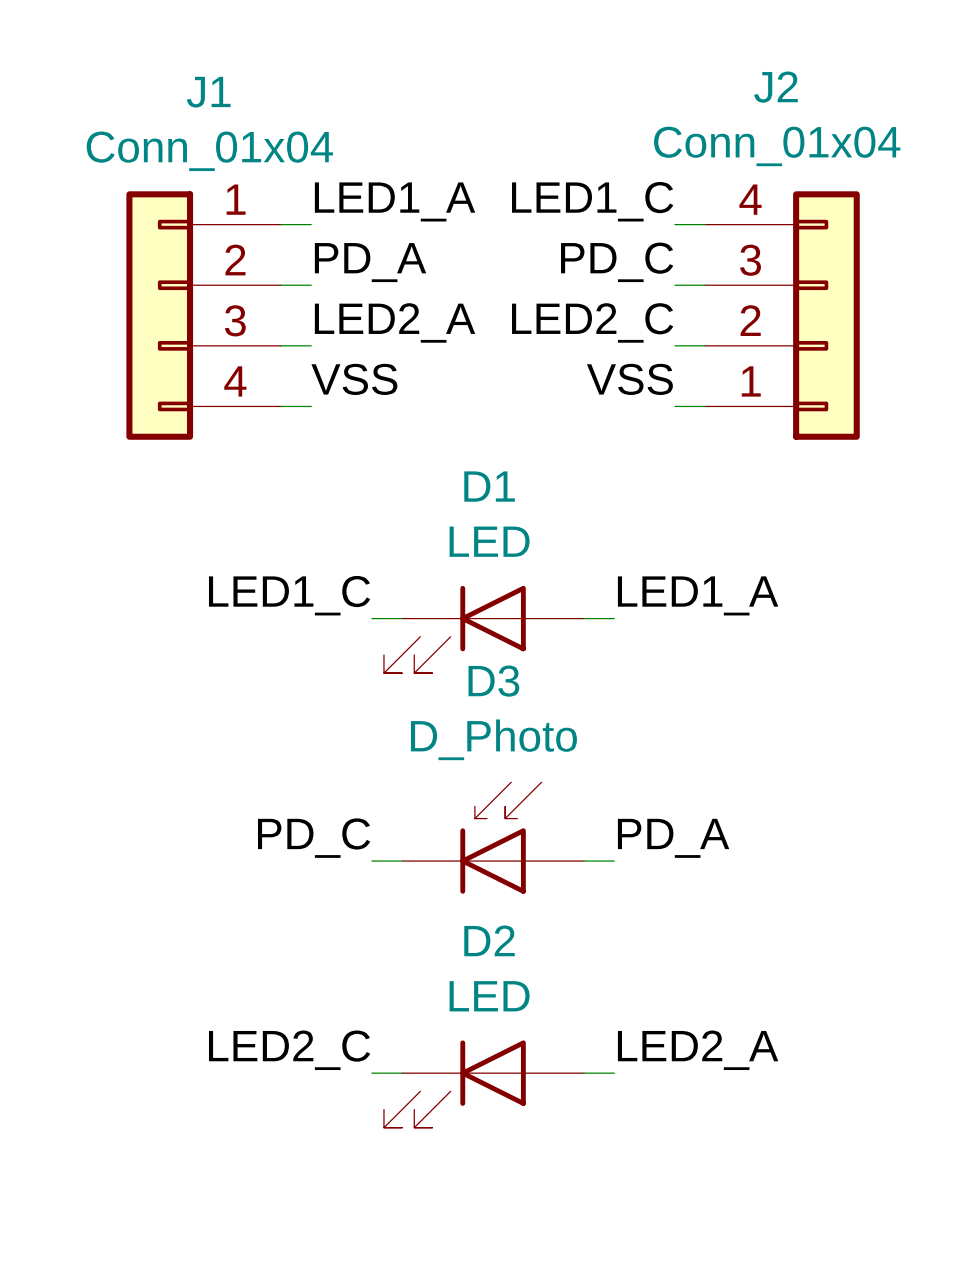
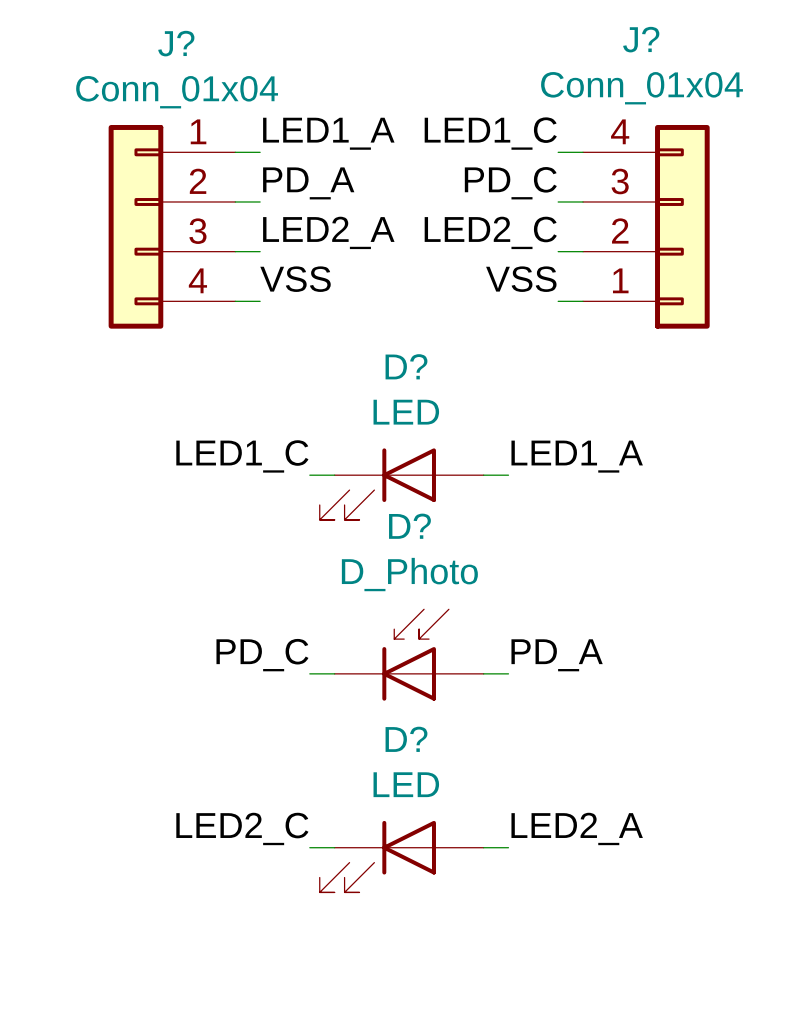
J2 name: J2 (775, 87) -> J? (641, 39)
J1 name: J1 (208, 92) -> J? (176, 43)
D1 name: D1 (489, 486) -> D? (406, 366)
D3 name: D3 (493, 681) -> D? (409, 526)
D2 name: D2 (489, 940) -> D? (406, 739)

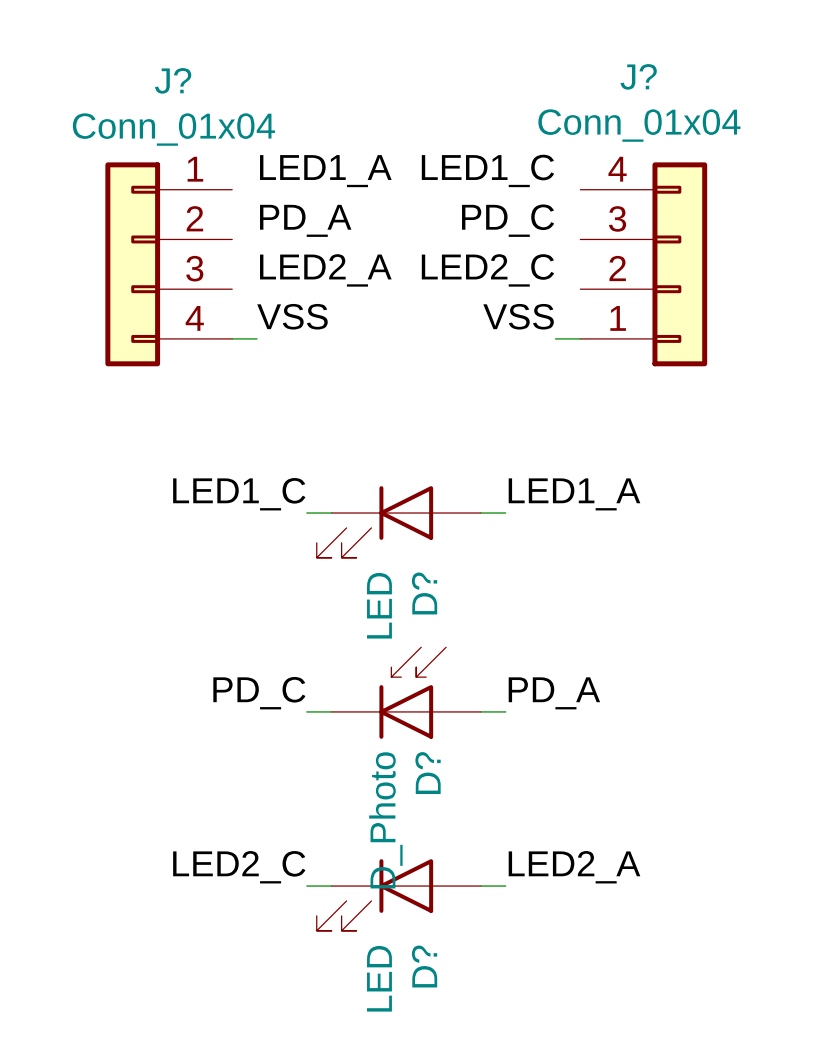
wire: (235, 152) (260, 152) -> none
wire: (558, 152) (583, 152) -> none
wire: (235, 201) (260, 201) -> none
wire: (558, 201) (583, 201) -> none
wire: (235, 251) (260, 251) -> none
wire: (558, 251) (583, 251) -> none
D? name rotation: 0° (406, 366) -> 90° counterclockwise (424, 593)
D? name position: D? (406, 366) -> D? (424, 593)
D? value rotation: 0° (406, 412) -> 90° counterclockwise (379, 605)
D? value position: LED (406, 412) -> LED (379, 605)
D? name rotation: 0° (409, 526) -> 90° counterclockwise (428, 773)
D? name position: D? (409, 526) -> D? (428, 773)
D? value rotation: 0° (409, 574) -> 90° counterclockwise (385, 820)
D? value position: D_Photo (409, 574) -> D_Photo (385, 820)
D? name rotation: 0° (406, 739) -> 90° counterclockwise (424, 966)
D? name position: D? (406, 739) -> D? (424, 966)
D? value rotation: 0° (406, 784) -> 90° counterclockwise (379, 978)
D? value position: LED (406, 784) -> LED (379, 978)

